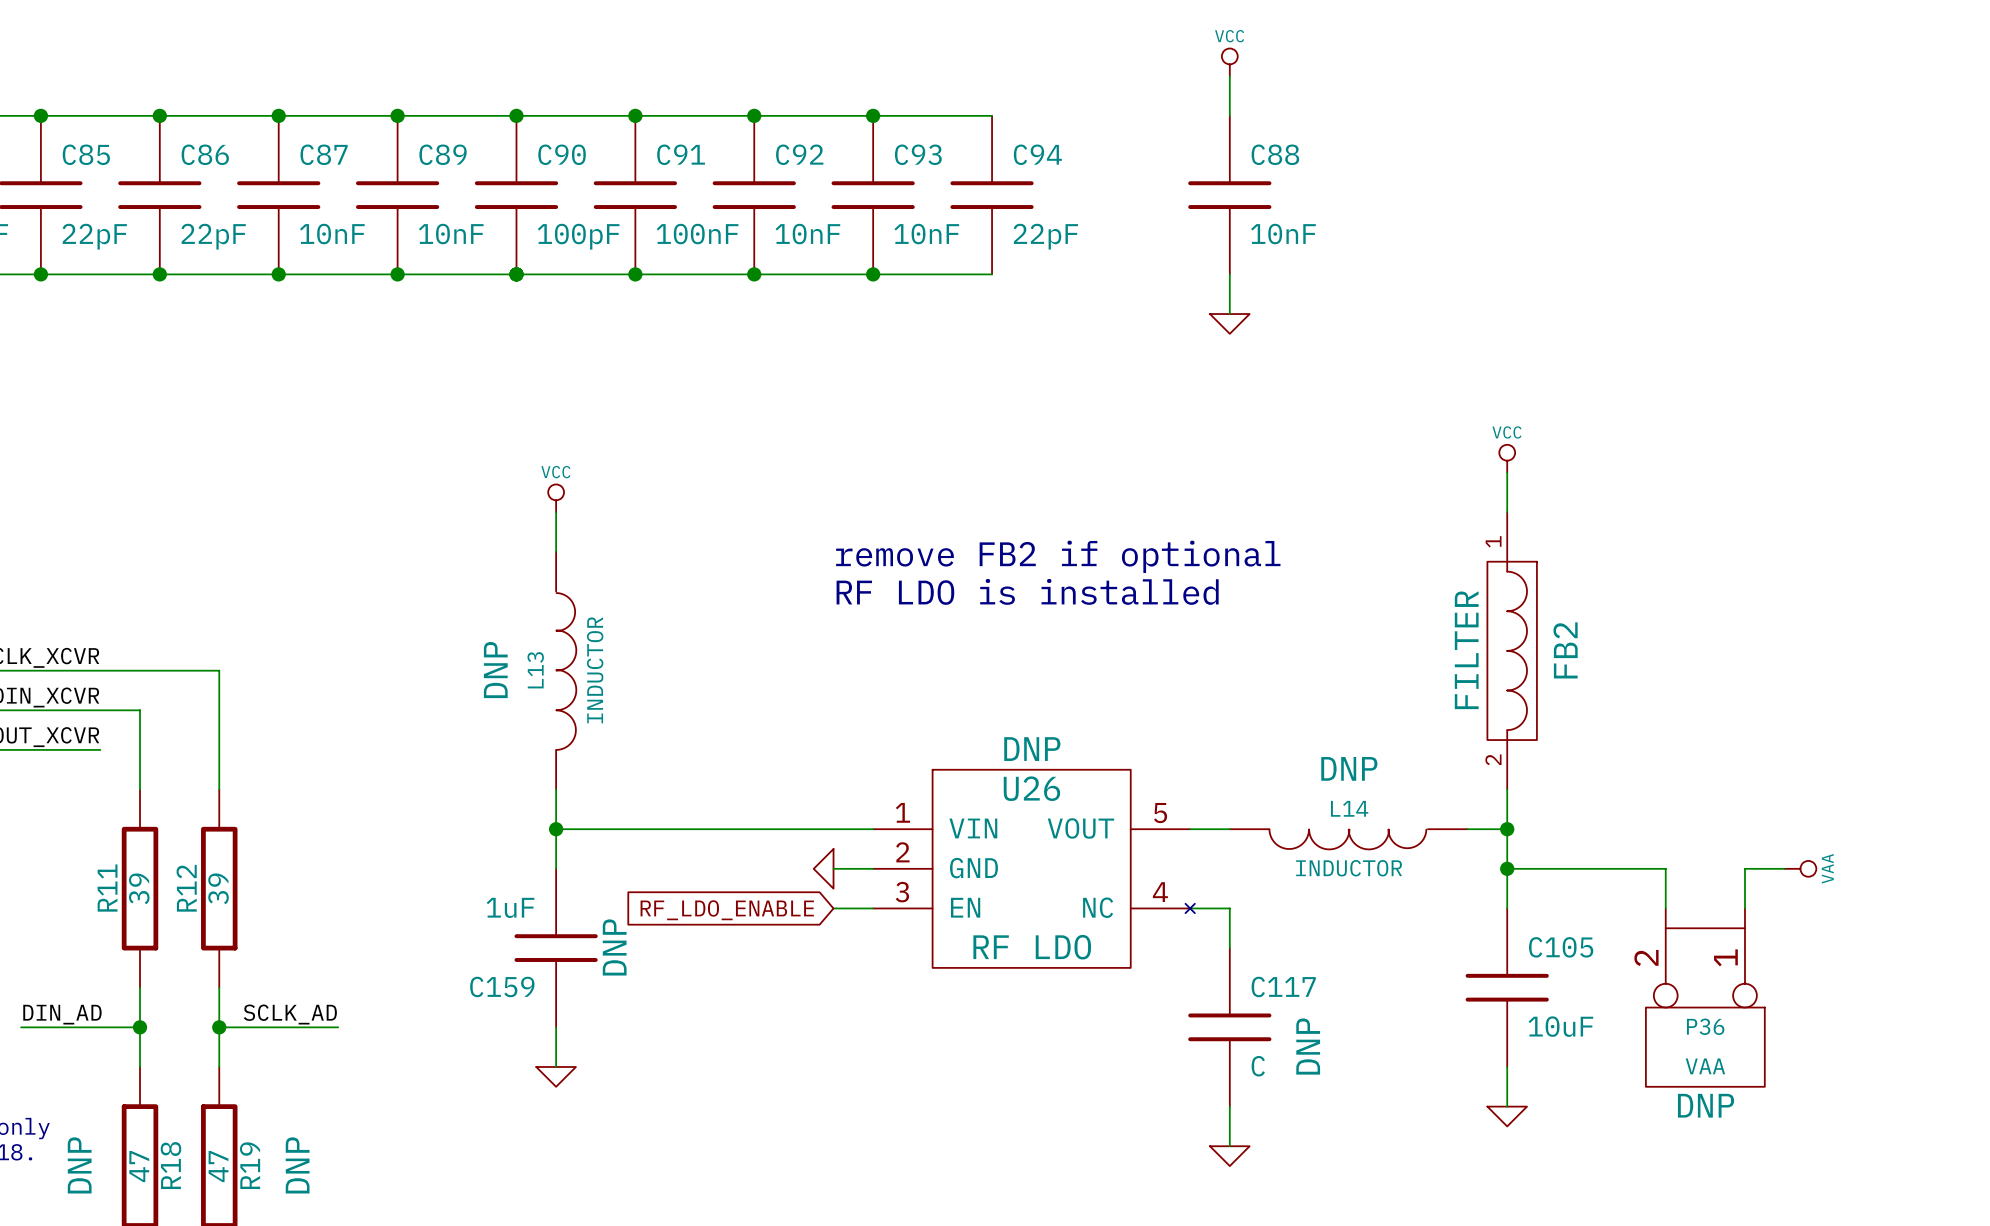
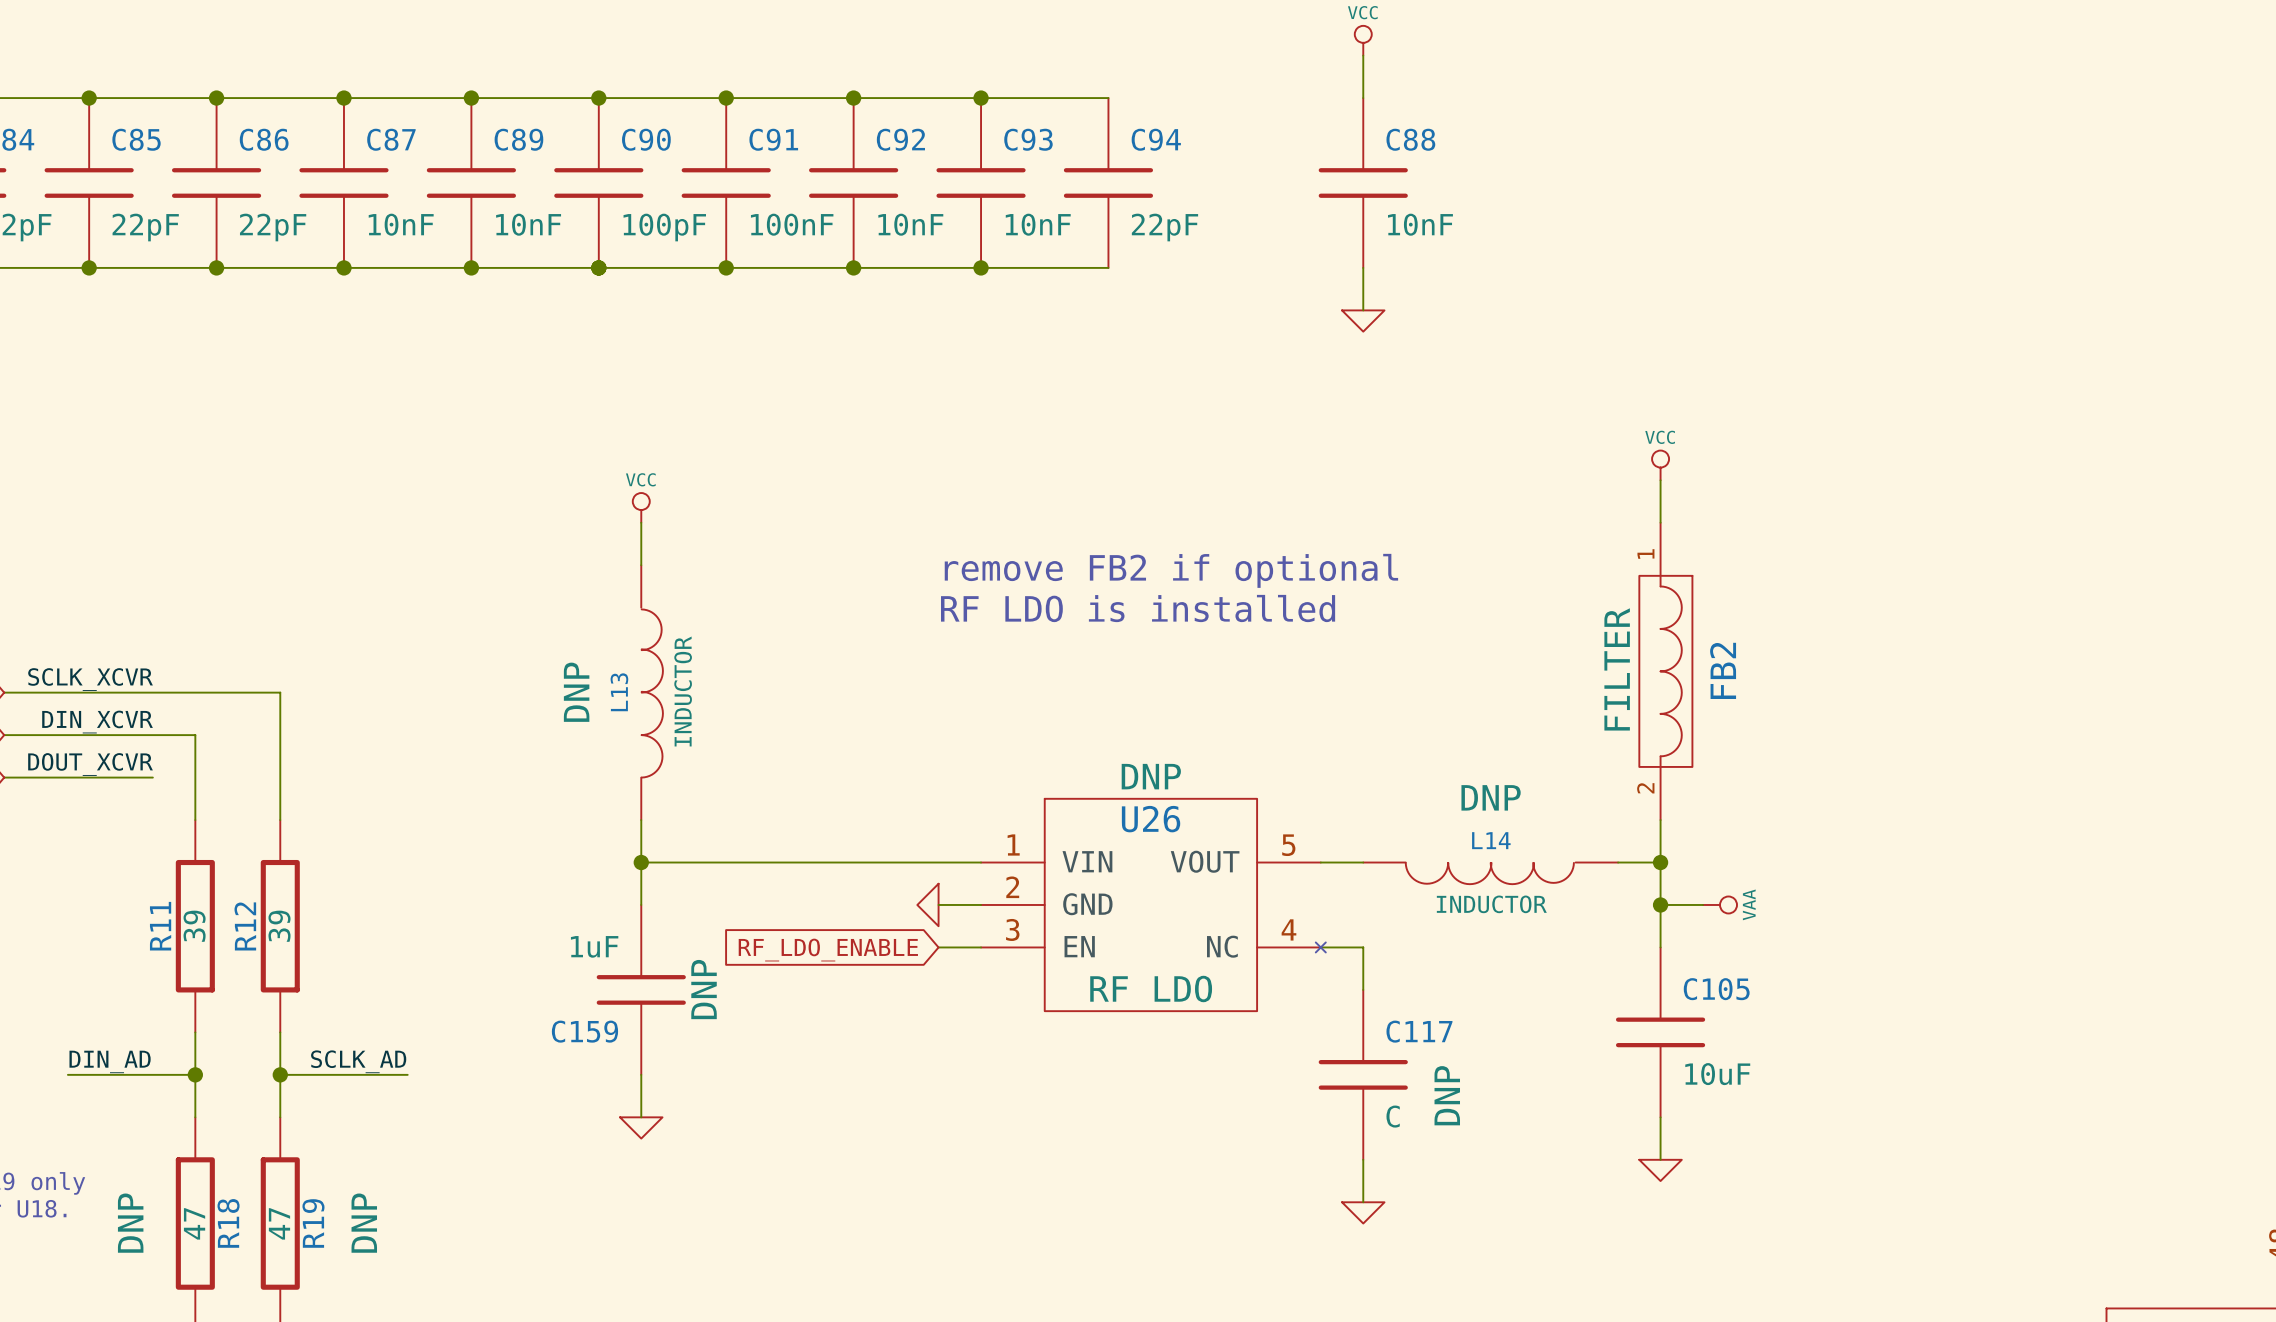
wire: (1546, 868) (1665, 868) (1665, 908) -> none
wire: (1784, 868) (1744, 868) (1744, 908) -> none
power symbol position: VAA (1800, 868) -> VAA (1720, 904)
P36: VAA (1705, 997) -> none

